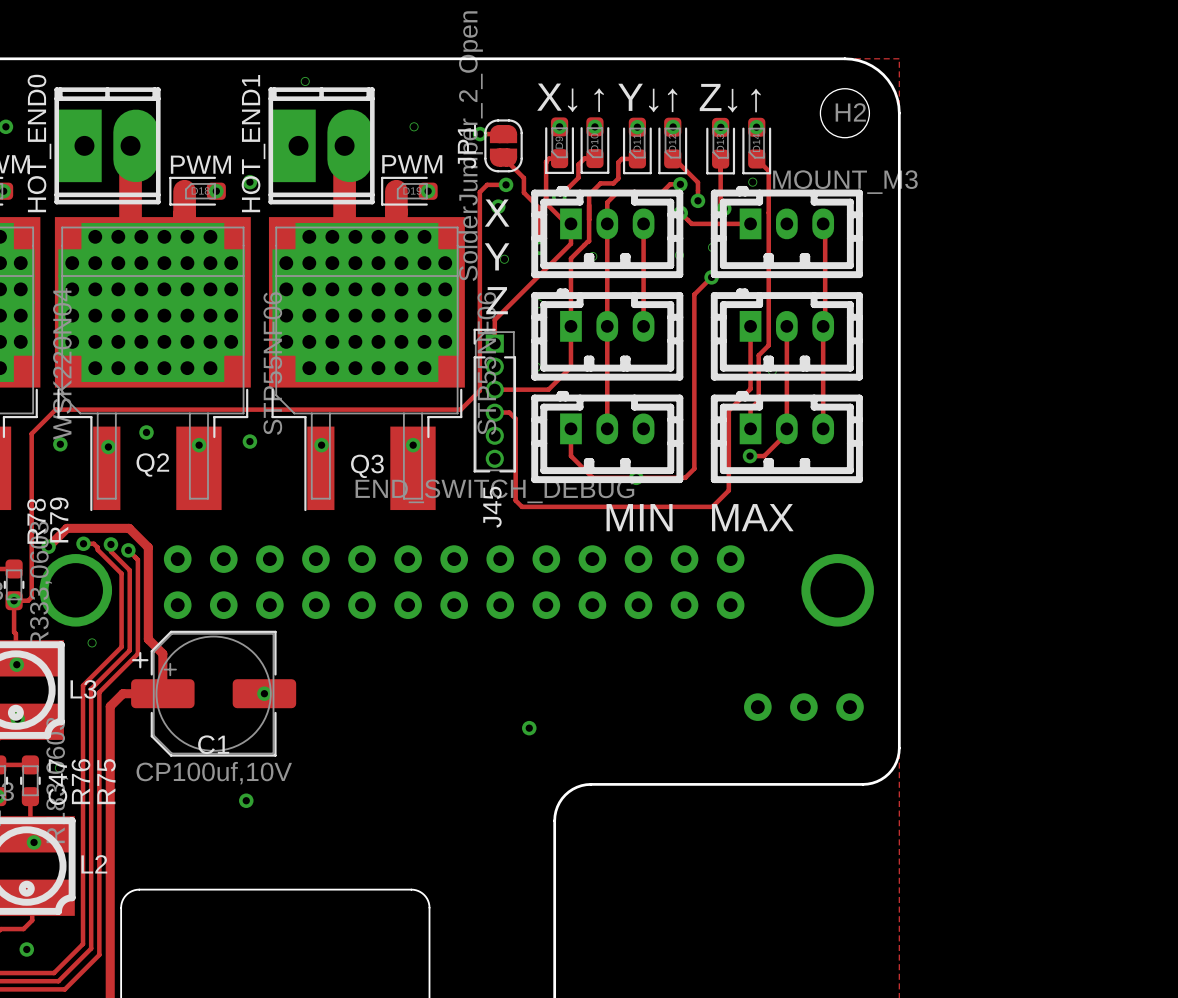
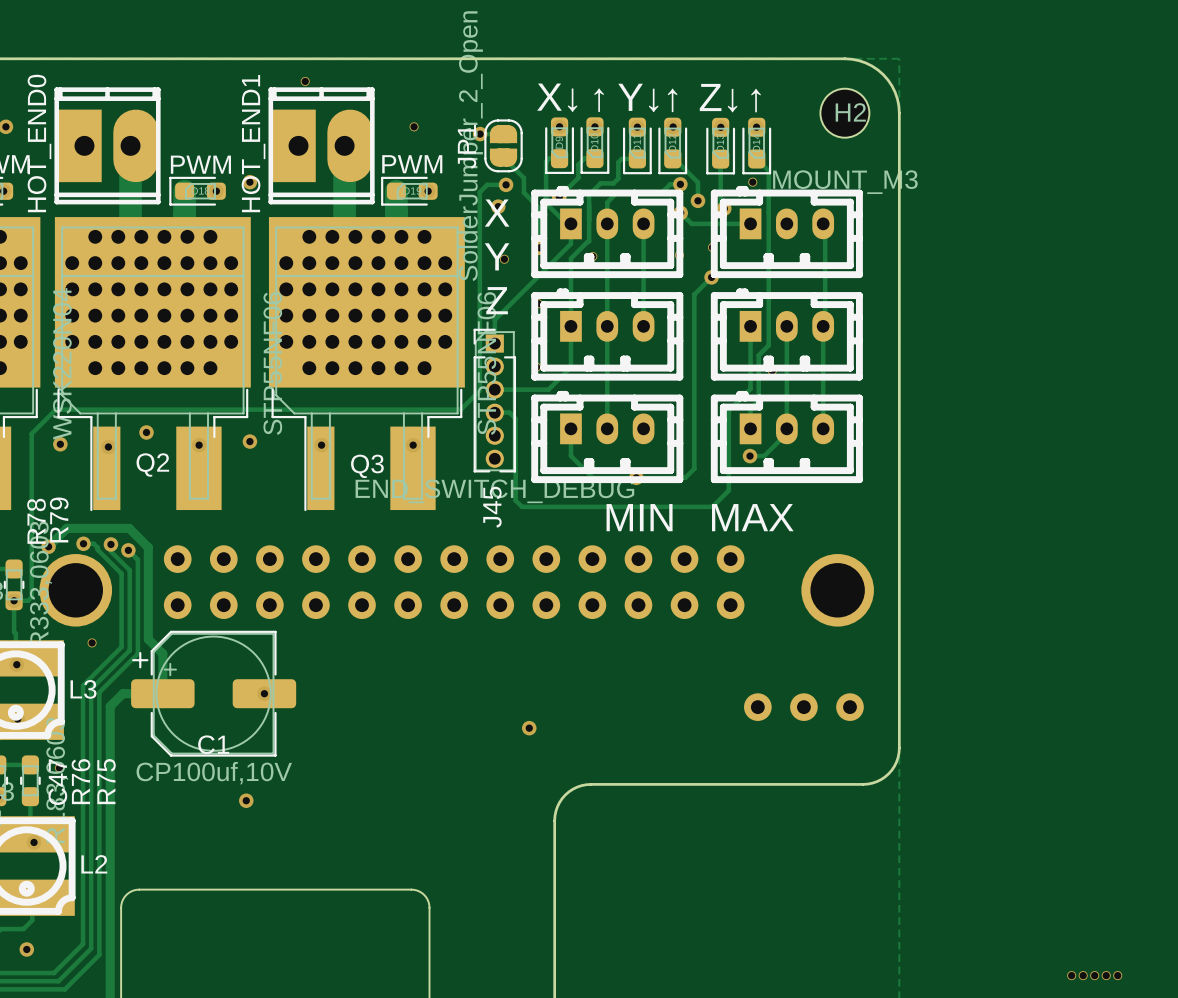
via: none -> (1071, 975)
via: none -> (1083, 975)
via: none -> (1094, 975)
via: none -> (1106, 975)
via: none -> (1117, 975)

